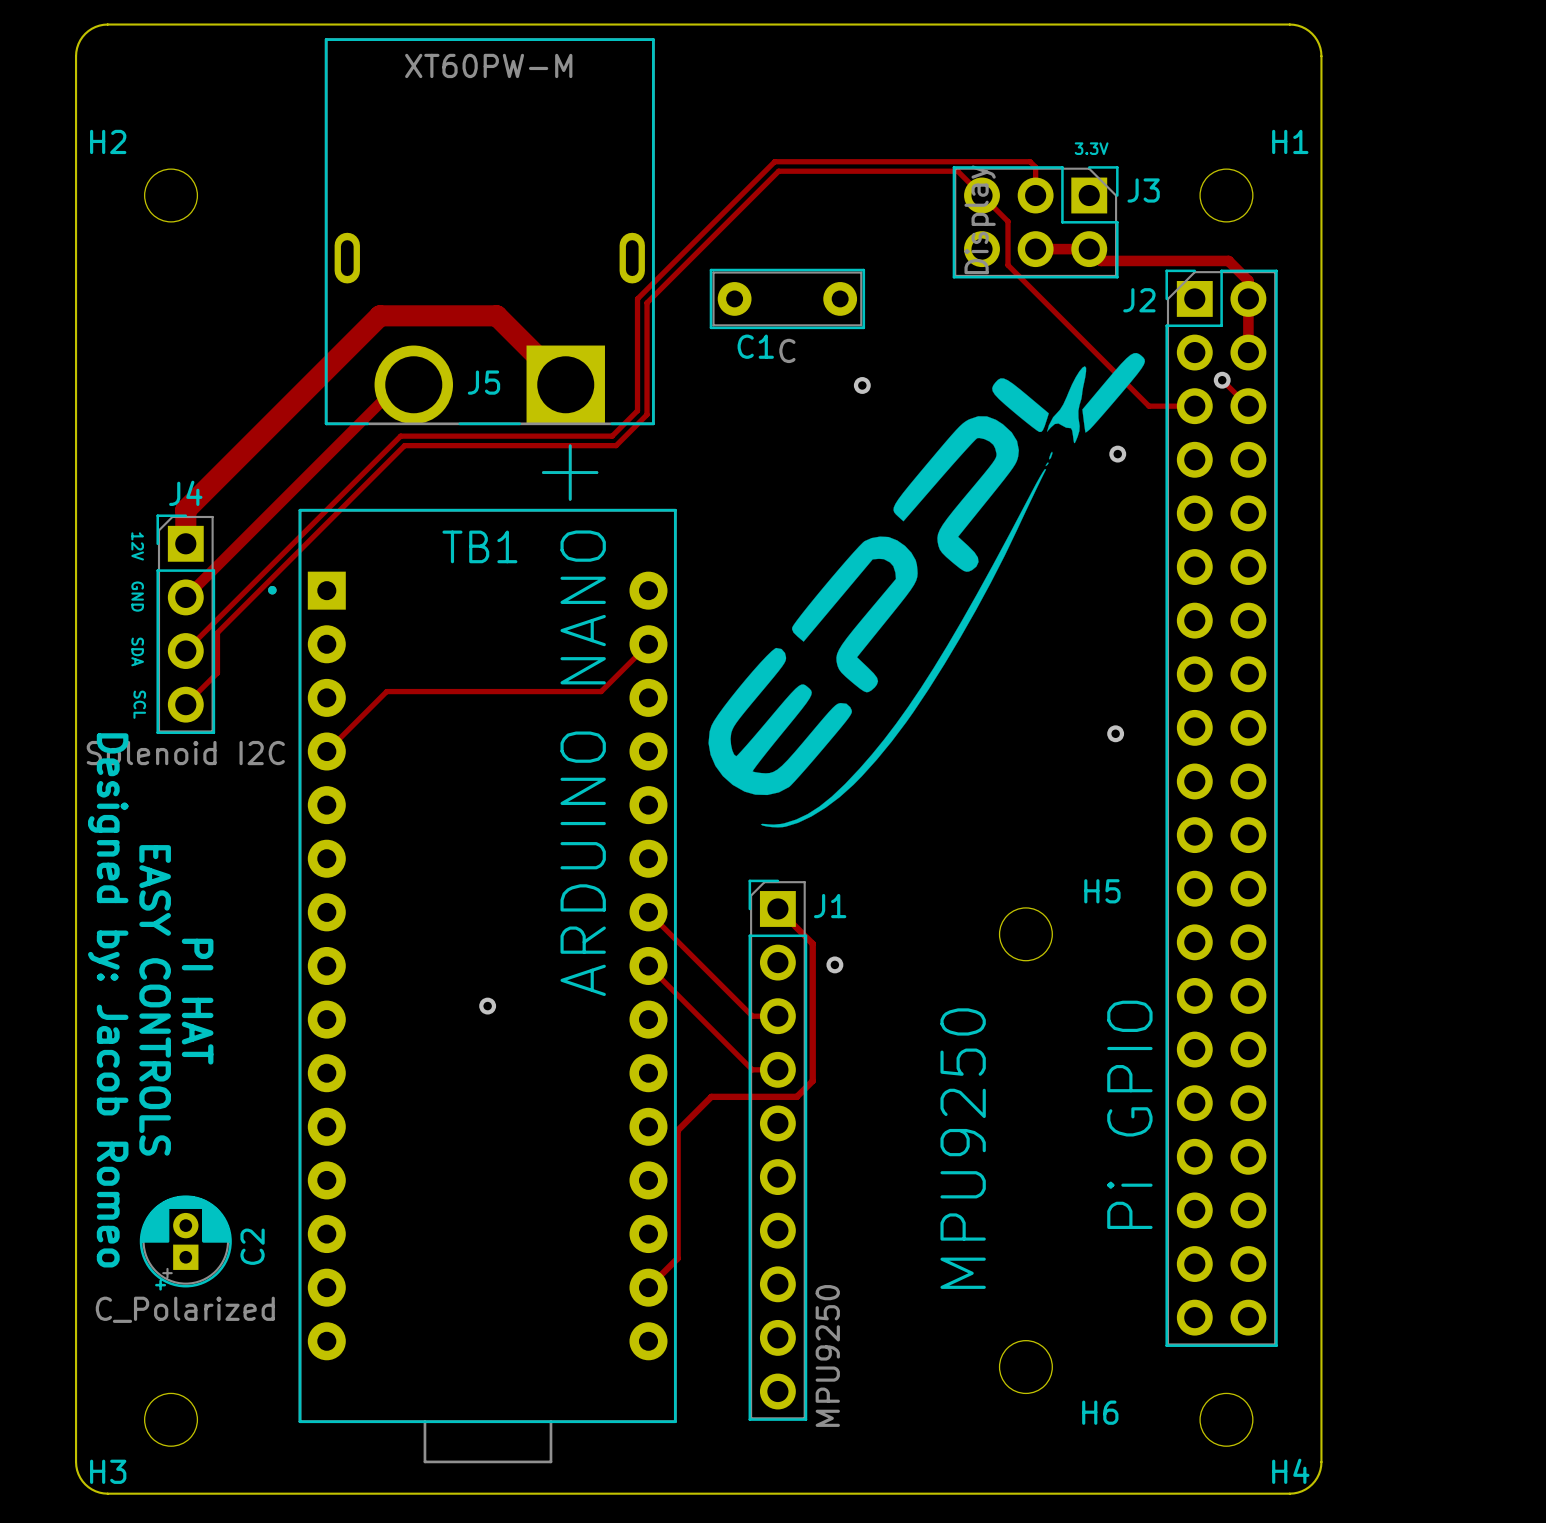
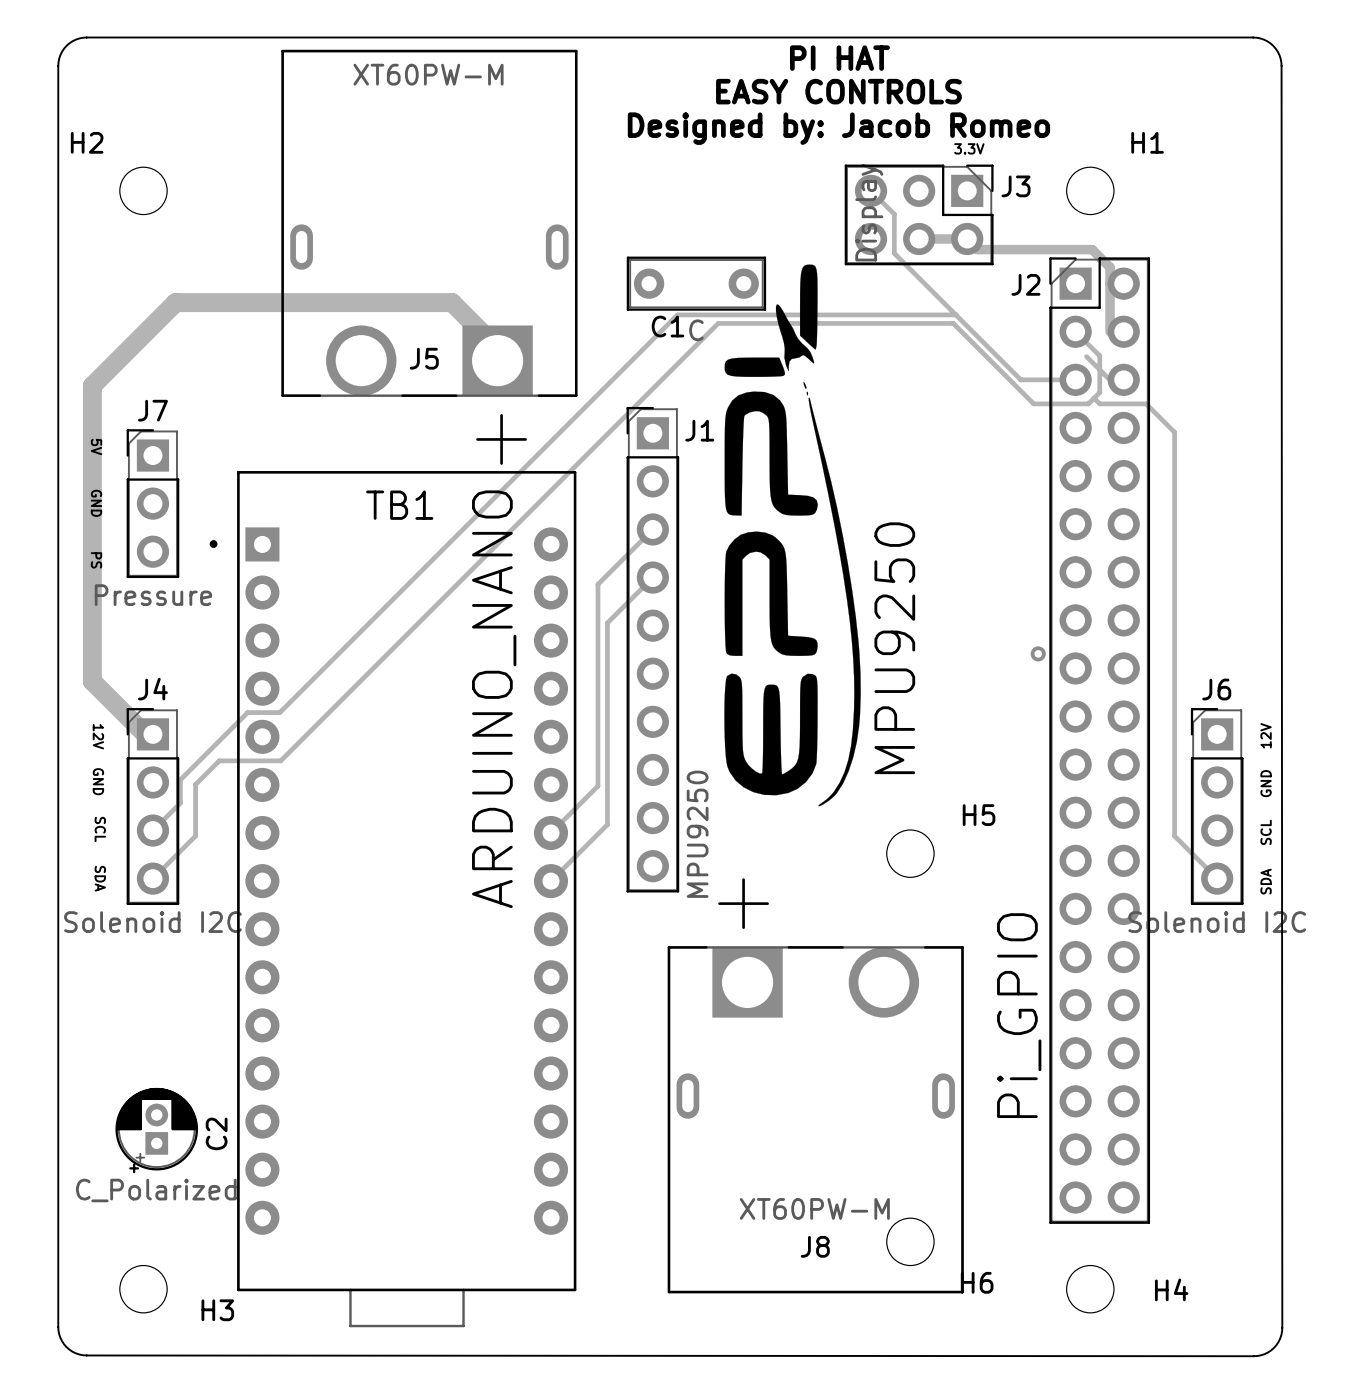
board edge: (1289, 24) (1301, 26) (1312, 33) (1319, 44) (1321, 56) (1321, 1462) (1320, 1470) (1314, 1481) (1301, 1491) (1289, 1493) (107, 1493) -> (1147, 37) (1256, 37) (1273, 45) (1281, 62) (1282, 1327) (1276, 1345) (1264, 1354) (1253, 1356) (86, 1355)
text: none -> PI HAT (839, 58)
text: none -> EASY CONTROLS (838, 91)
text: none -> Designed by: Jacob Romeo (838, 128)
track: (982, 195) (957, 171) (778, 171) (647, 302) (647, 414) (616, 445) (404, 445) (217, 632) (217, 672) (185, 704) -> none
track: (1035, 195) (1035, 167) (1030, 161) (774, 161) (637, 298) (637, 410) (612, 436) (400, 436) (185, 651) -> none
drawing: none -> [724, 264, 861, 807]
track: none -> (956, 314) (677, 314) (279, 712) (247, 712) (180, 779) (180, 803) (152, 830)
drawing: [708, 352, 1145, 828] -> none
track: none -> (1075, 331) (1099, 355) (1099, 392) (1088, 403) (1033, 403) (953, 323) (718, 323) (280, 760) (219, 760) (195, 784) (195, 836) (152, 878)
via: (1222, 380) -> none
track: (413, 384) (398, 384) (185, 597) -> none
track: (565, 384) (496, 315) (380, 315) (185, 510) (185, 543) -> (497, 360) (497, 348) (452, 302) (175, 302) (92, 385) (92, 681) (145, 734) (152, 734)
via: (862, 385) -> none
track: none -> (1094, 398) (1099, 403) (1146, 403) (1174, 432) (1174, 836) (1217, 878)
via: (1117, 454) -> none
text: none -> 5V (96, 446)
J7: none -> Pressure (152, 503)
text position: 12V (137, 546) -> 12V (98, 736)
track: none -> (652, 529) (597, 584) (597, 786) (551, 833)
text position: GND (137, 596) -> GND (96, 503)
text: none -> PS (96, 560)
J4 position: (185, 624) -> (152, 806)
track: none -> (652, 577) (607, 623) (607, 824) (551, 881)
track: (648, 644) (601, 691) (386, 691) (326, 751) -> none
text position: SDA (137, 651) -> SDA (100, 878)
text position: SCL (139, 704) -> SCL (100, 829)
via position: (1115, 733) -> (1038, 653)
TB1 value: ARDUINO NANO (583, 763) -> ARDUINO_NANO (494, 699)
text: none -> 12V (1266, 735)
J2 position: (1221, 808) -> (1099, 740)
text: none -> GND (98, 781)
text: none -> GND (1266, 783)
J6: none -> Solenoid I2C (1217, 806)
track: (777, 908) (812, 943) (812, 1081) (796, 1096) (711, 1096) (677, 1130) (677, 1258) (648, 1287) -> none
text: none -> SCL (1266, 832)
track: (648, 912) (752, 1016) (777, 1016) -> none
via: (834, 964) -> none
track: (648, 965) (752, 1069) (777, 1069) -> none
text: none -> SDA (1266, 881)
TB1 position: (472, 986) -> (393, 899)
text: Designed by: Jacob Romeo (108, 1000) -> none
text: EASY CONTROLS (155, 1000) -> none
text: PI HAT (197, 1001) -> none
via: (487, 1006) -> none
J2 value: Pi GPIO (1129, 1114) -> Pi_GPIO (1019, 1015)
text position: MPU9250 (963, 1148) -> MPU9250 (894, 648)
J1 position: (777, 1150) -> (652, 649)
J8: none -> XT60PW-M (815, 1085)
H3 name position: H3 (108, 1471) -> H3 (217, 1310)
H4 name position: H4 (1290, 1471) -> H4 (1171, 1289)

